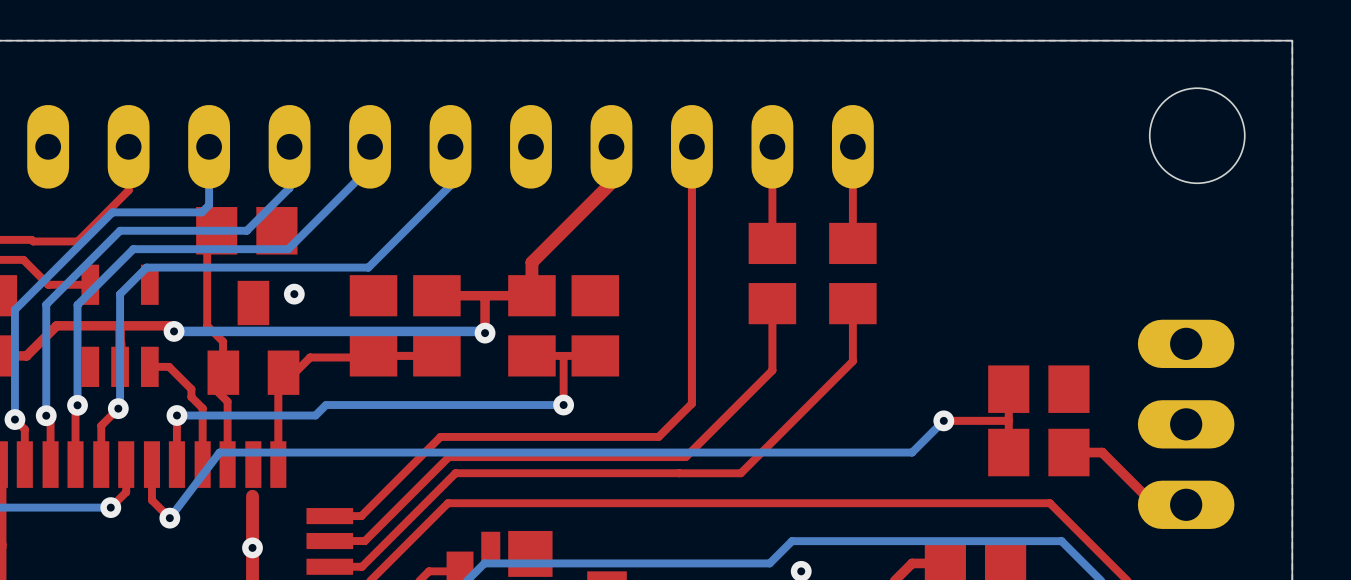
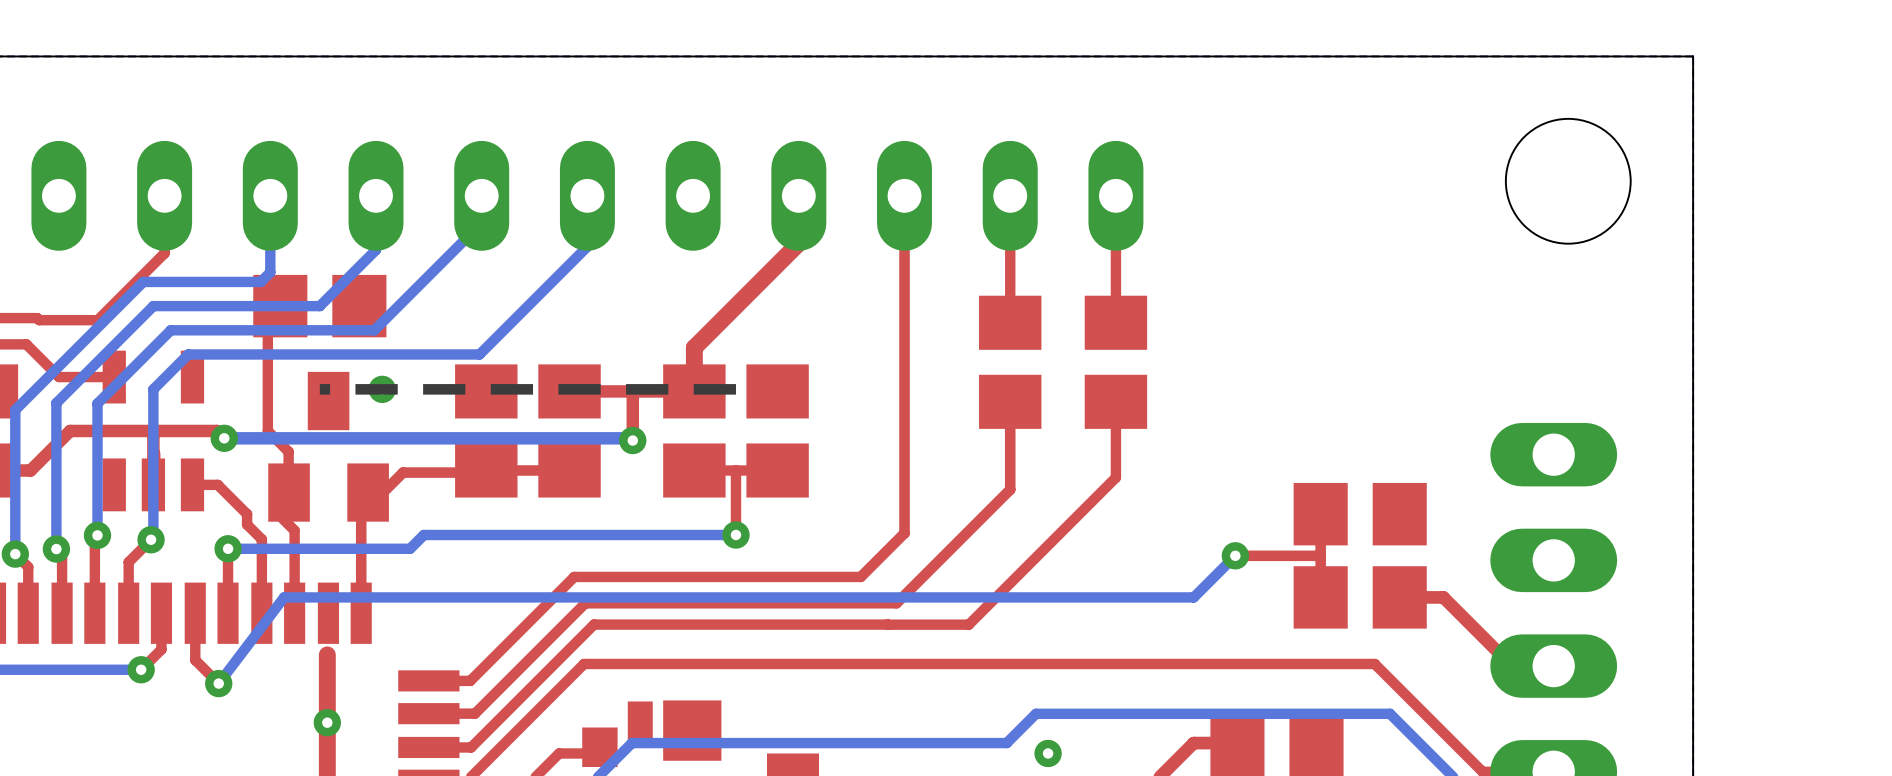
line: none -> (735, 389) (319, 389)

